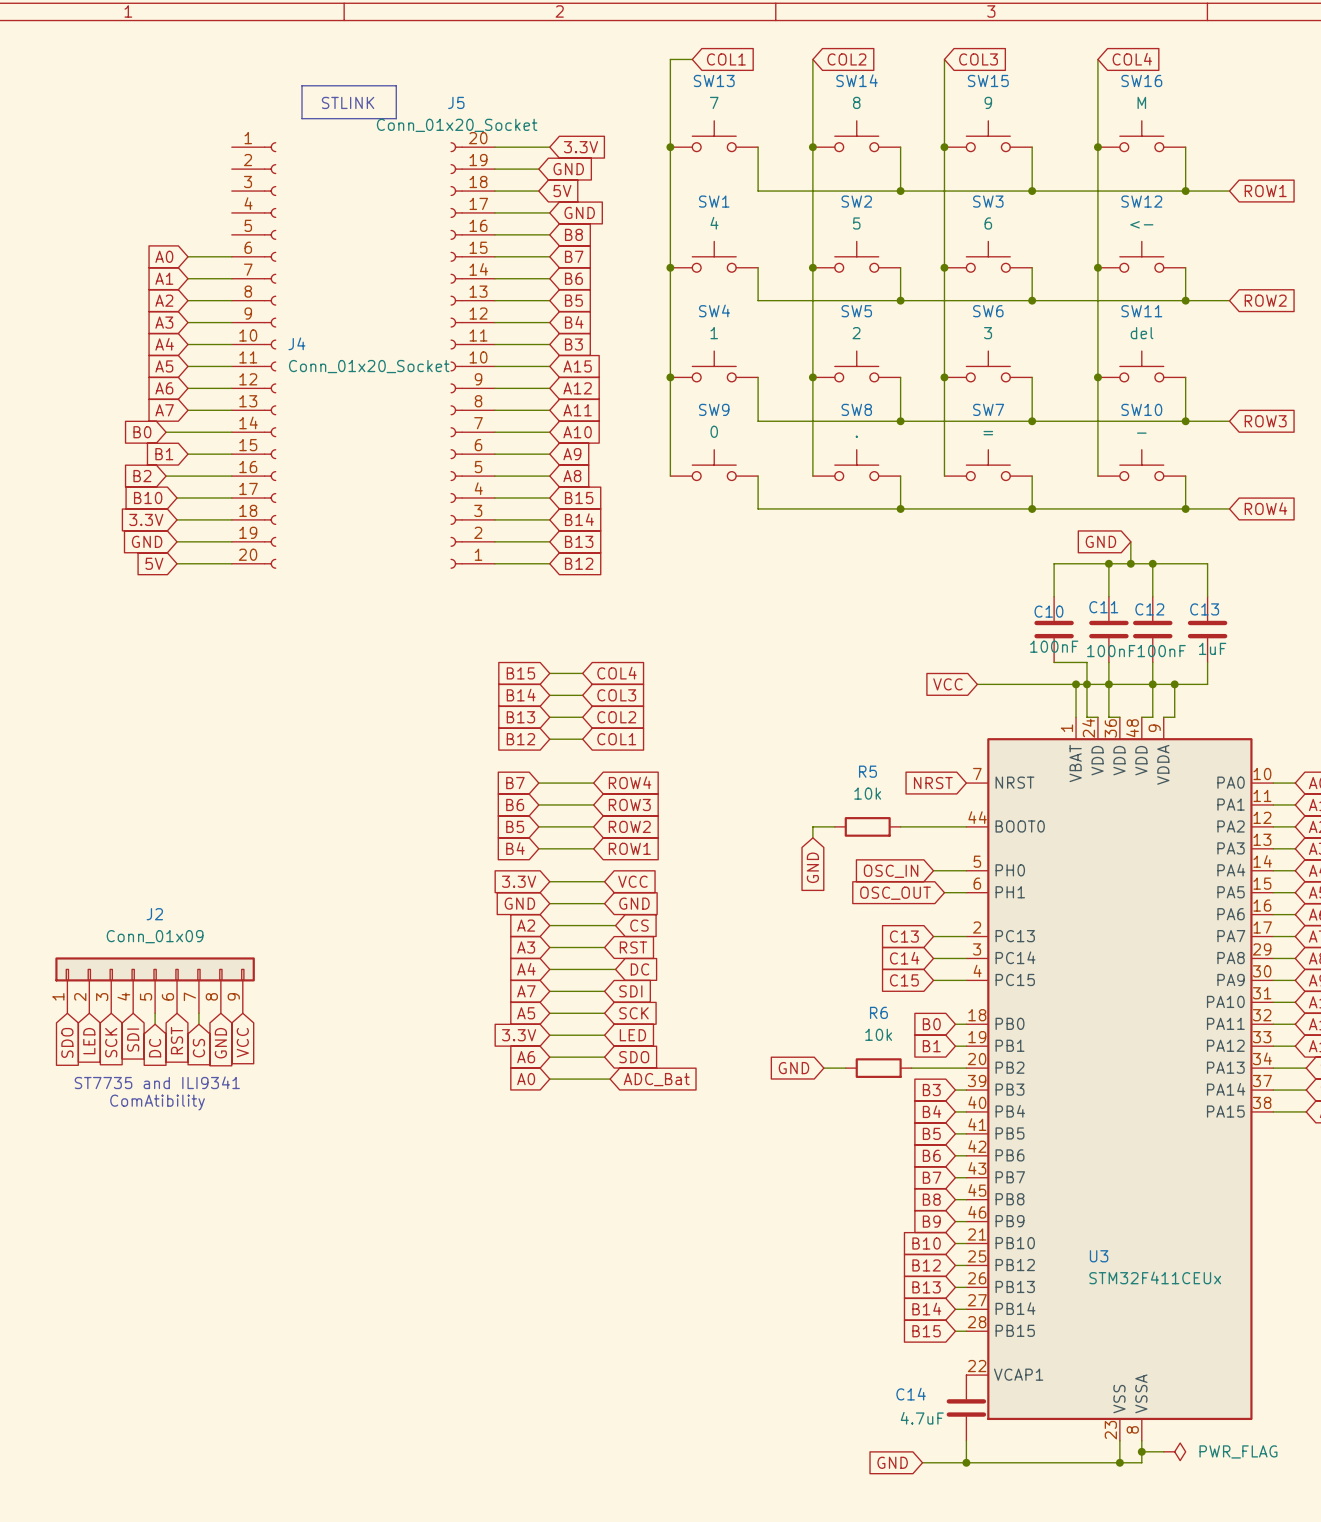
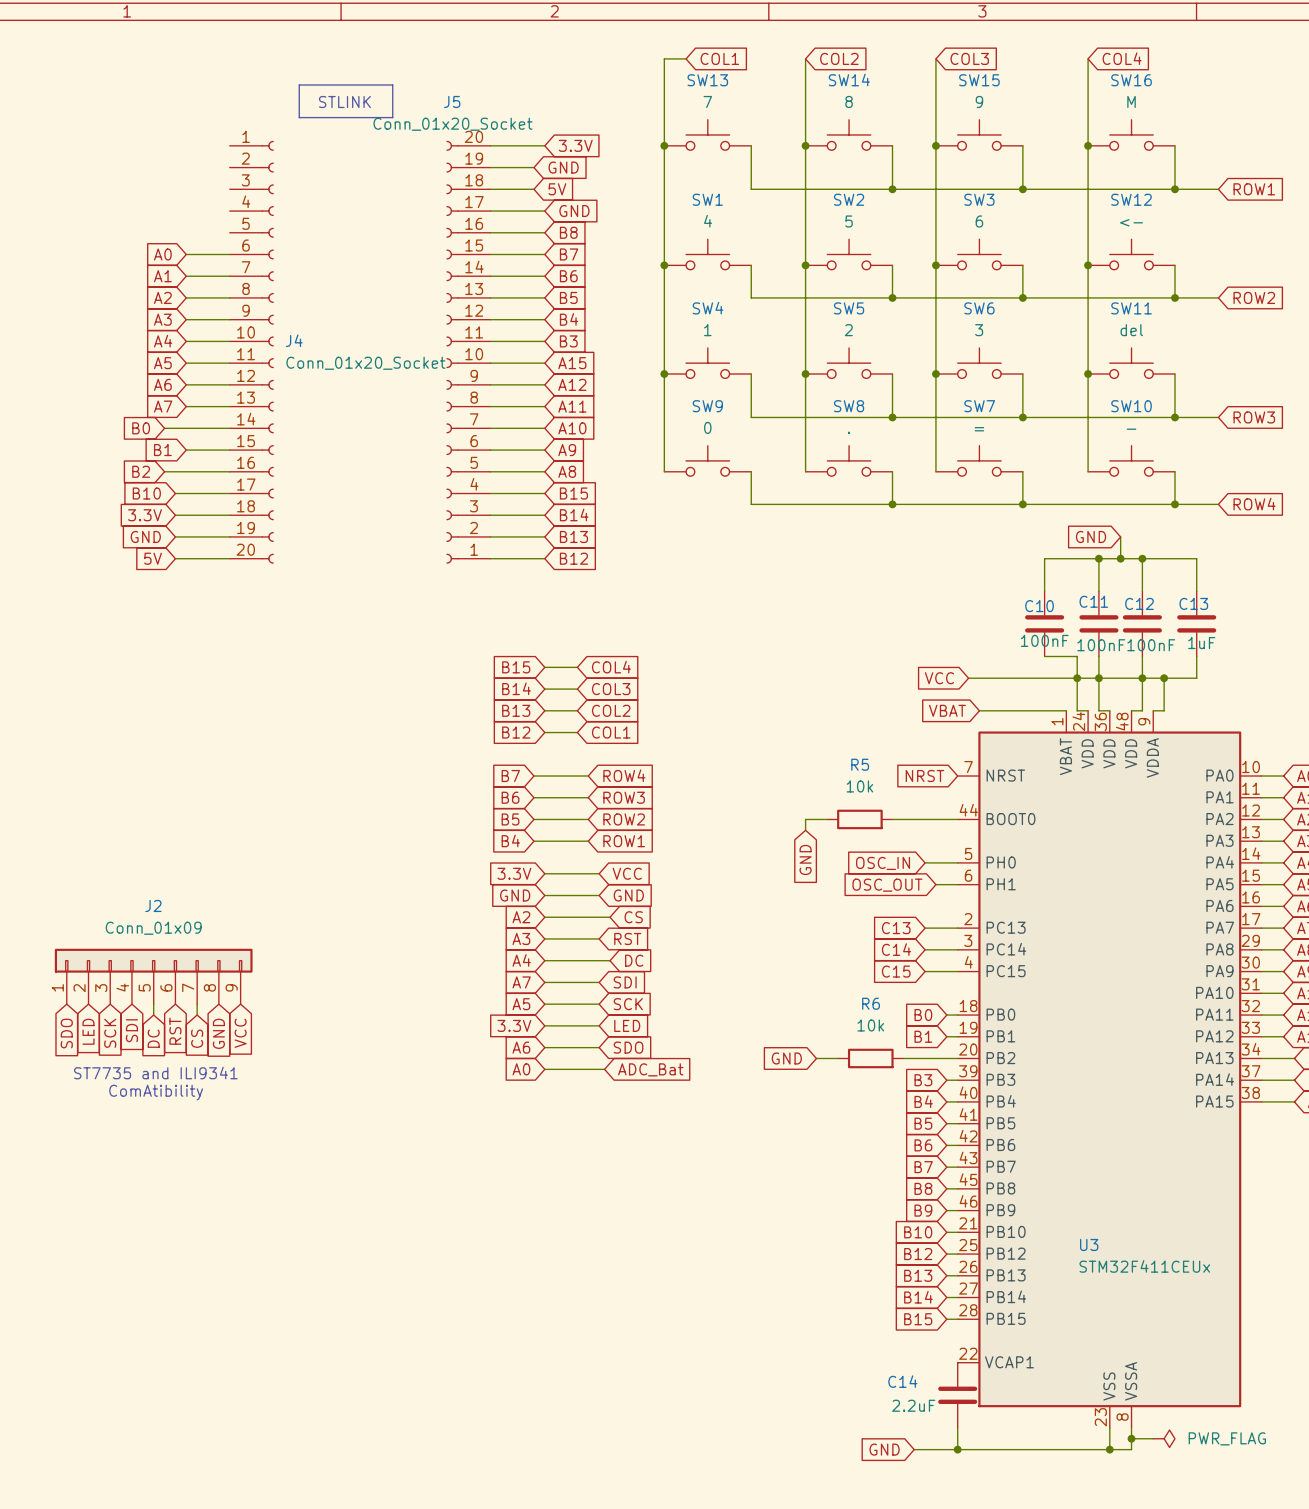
wire: (1076, 684) (1076, 717) -> (979, 710) (1066, 710)
junction: (1076, 684) -> none
global label: none -> VBAT (947, 710)
C14 value: 4.7uF (922, 1418) -> 2.2uF (913, 1405)

